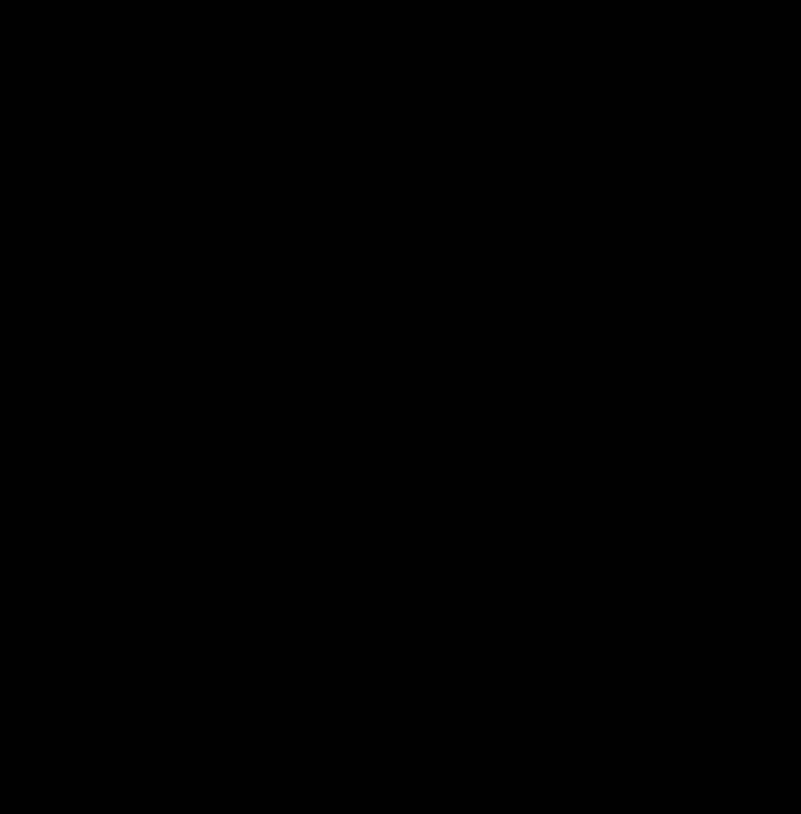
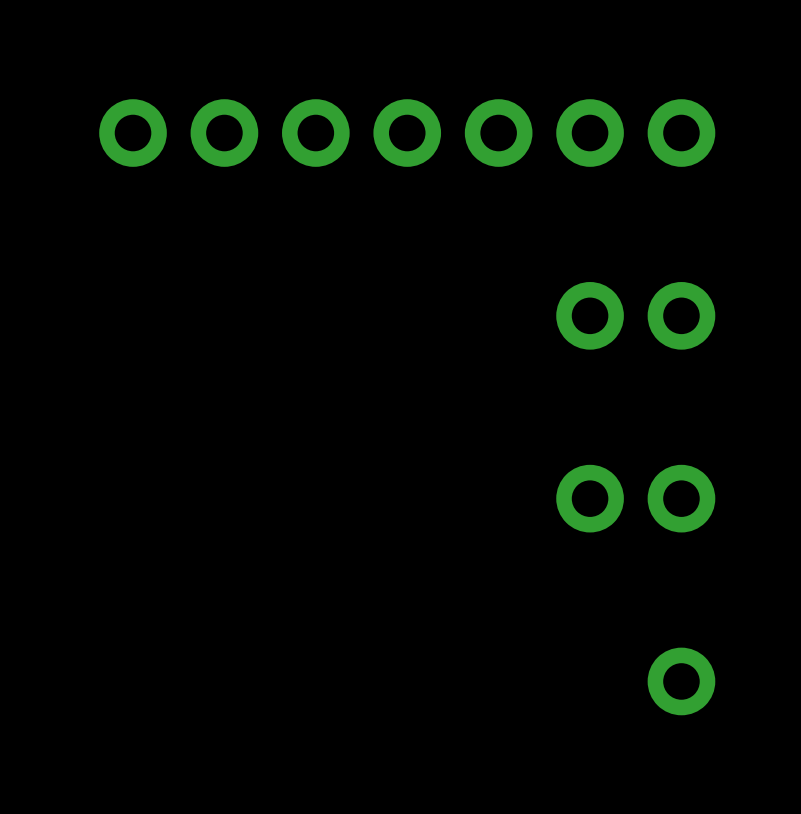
part: none -> (407, 133)
part: none -> (635, 315)
part: none -> (635, 498)
part: none -> (681, 681)

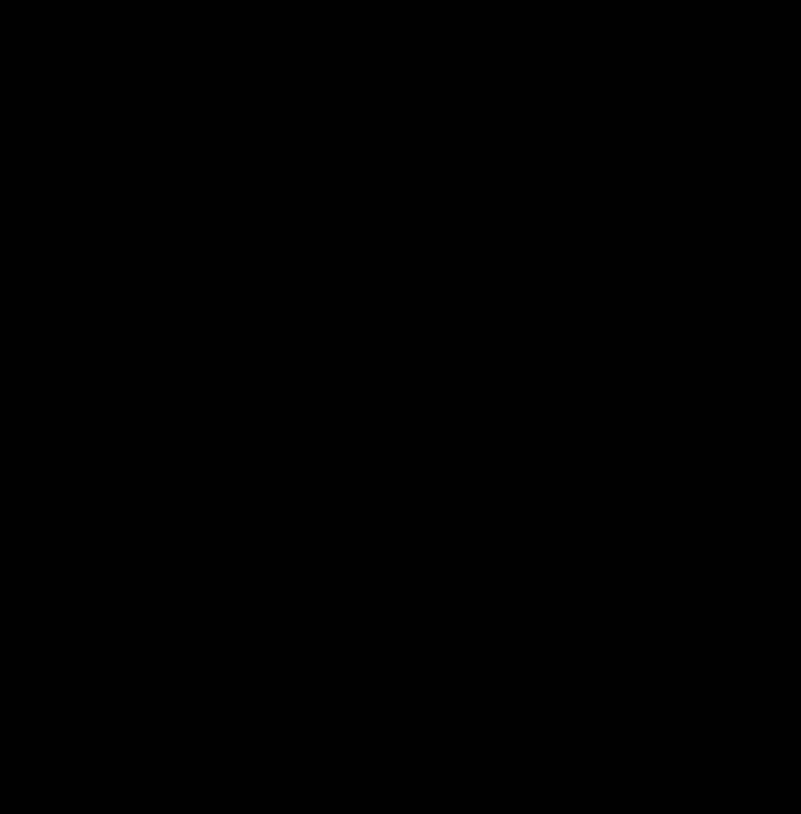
part: (407, 133) -> none
part: (635, 315) -> none
part: (635, 498) -> none
part: (681, 681) -> none

